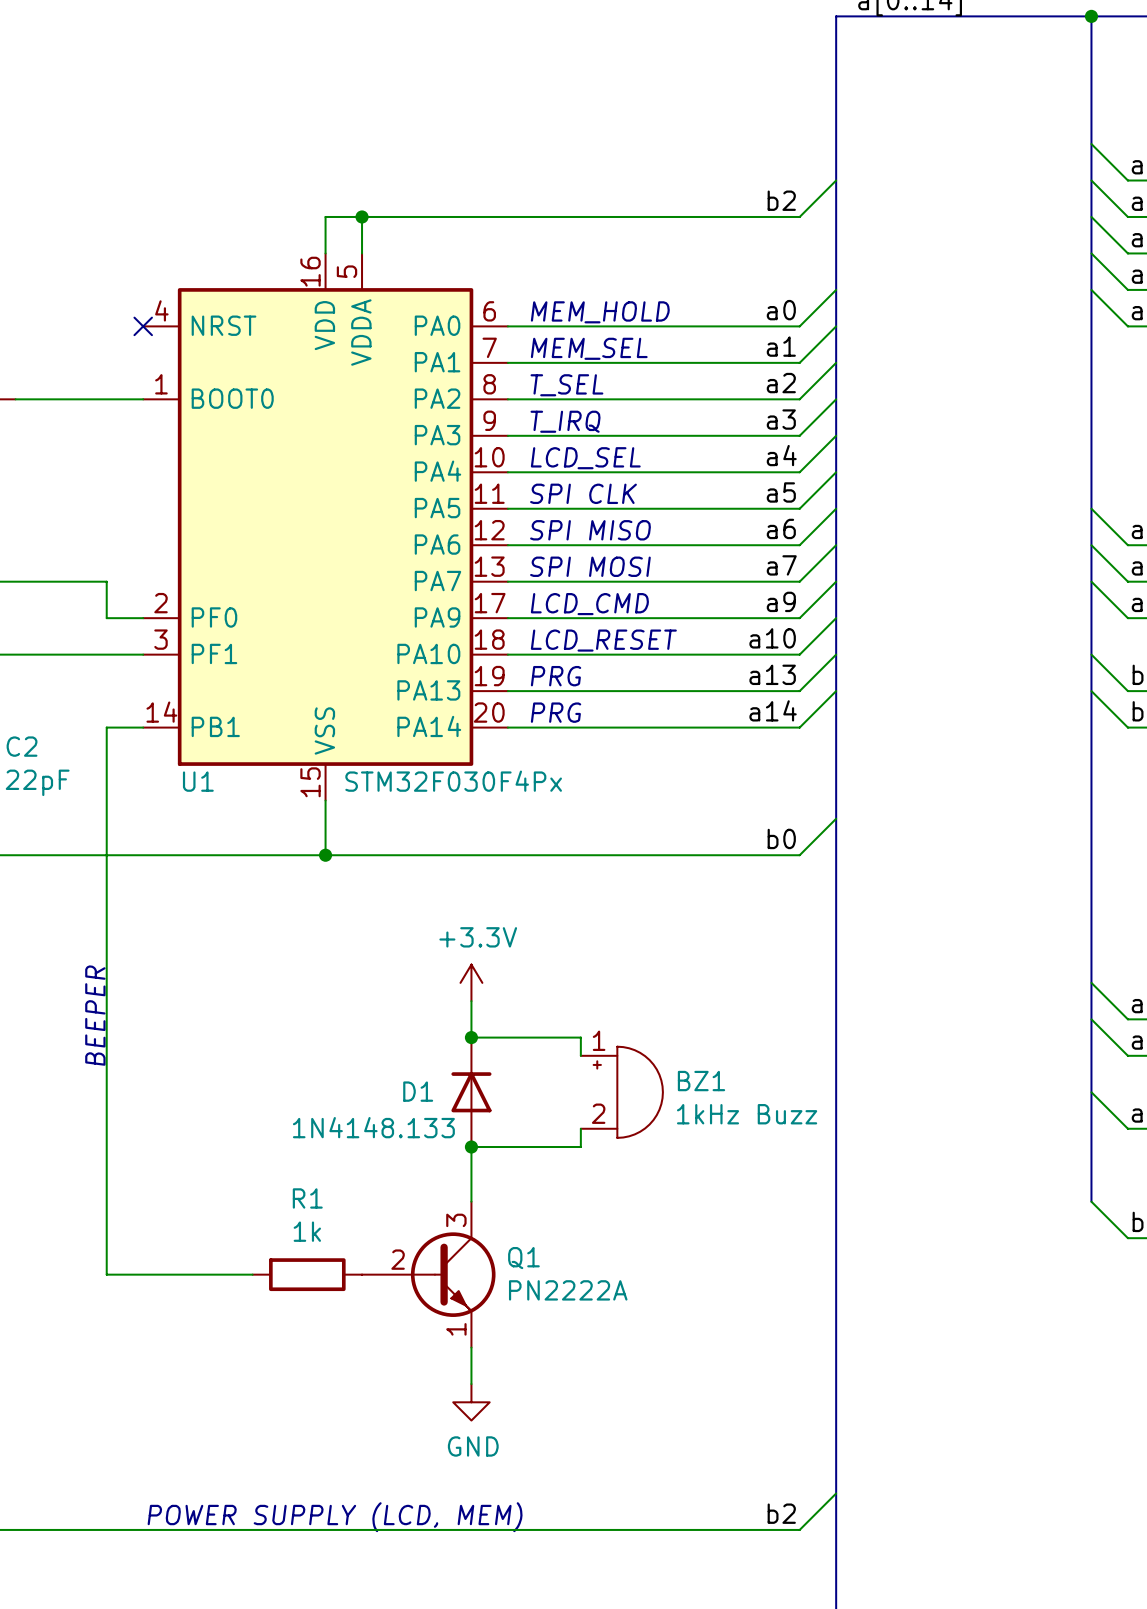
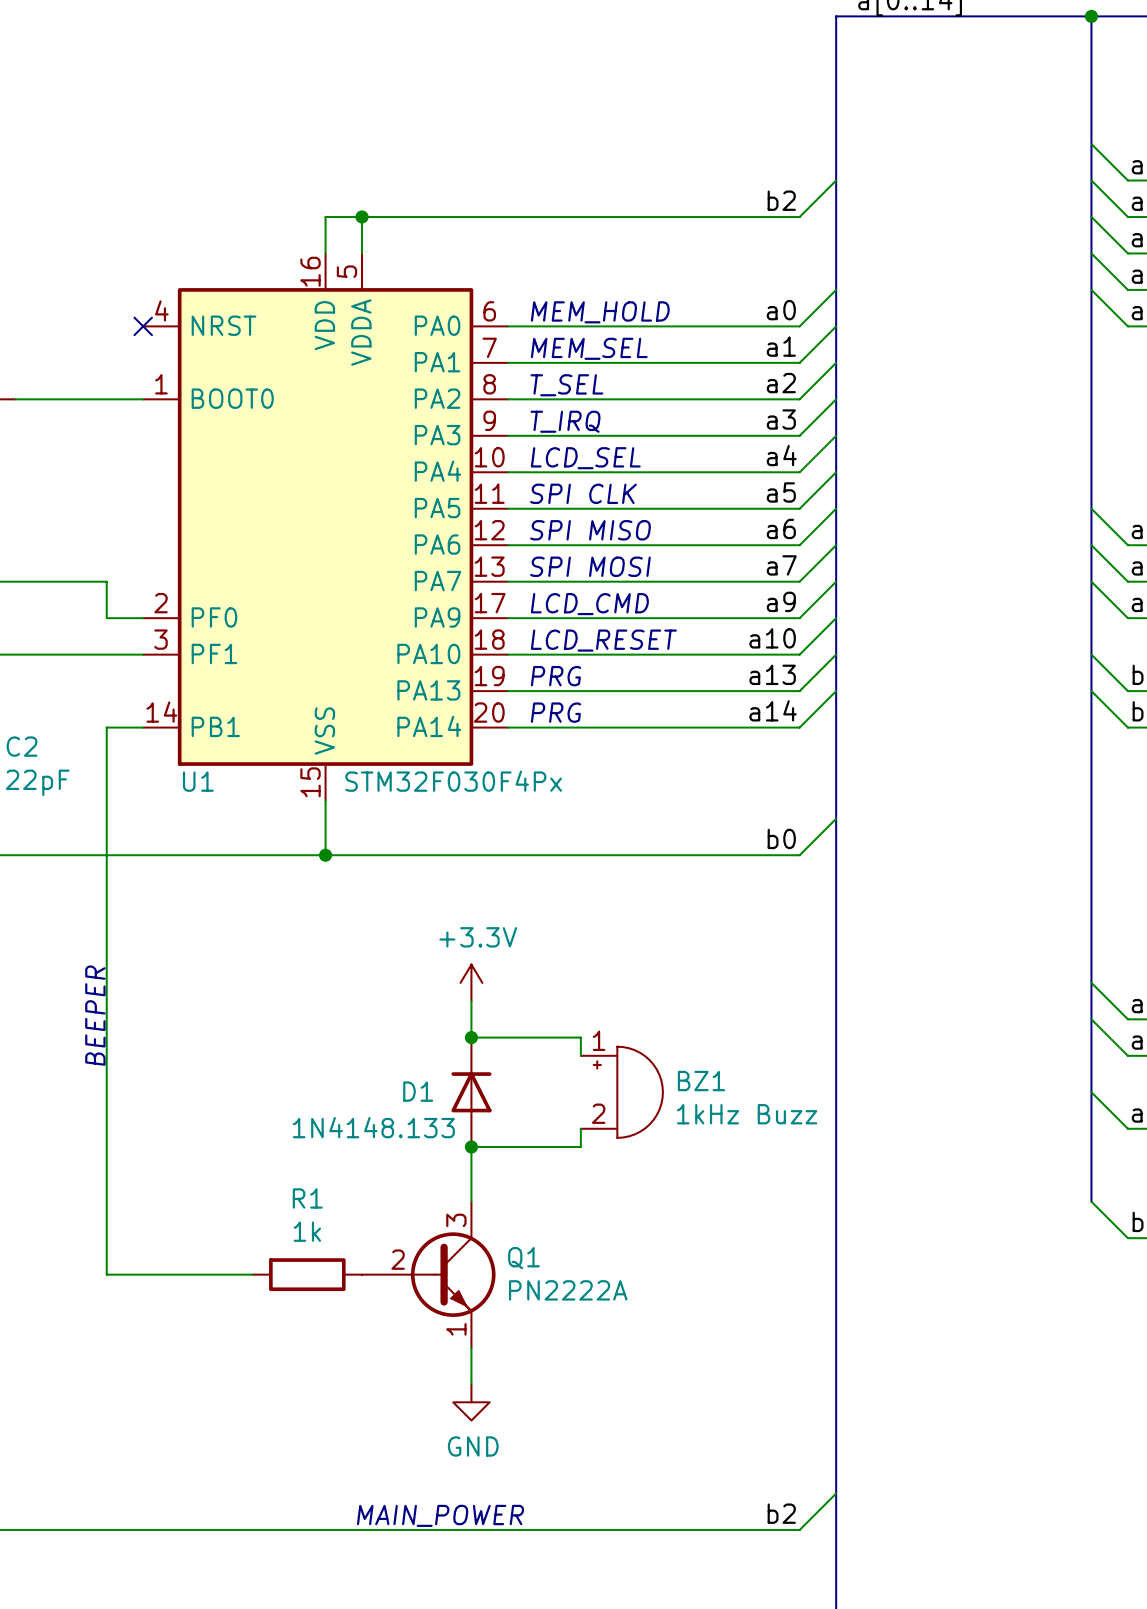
text: POWER SUPPLY (LCD, MEM) (335, 1517) -> MAIN_POWER (440, 1515)

